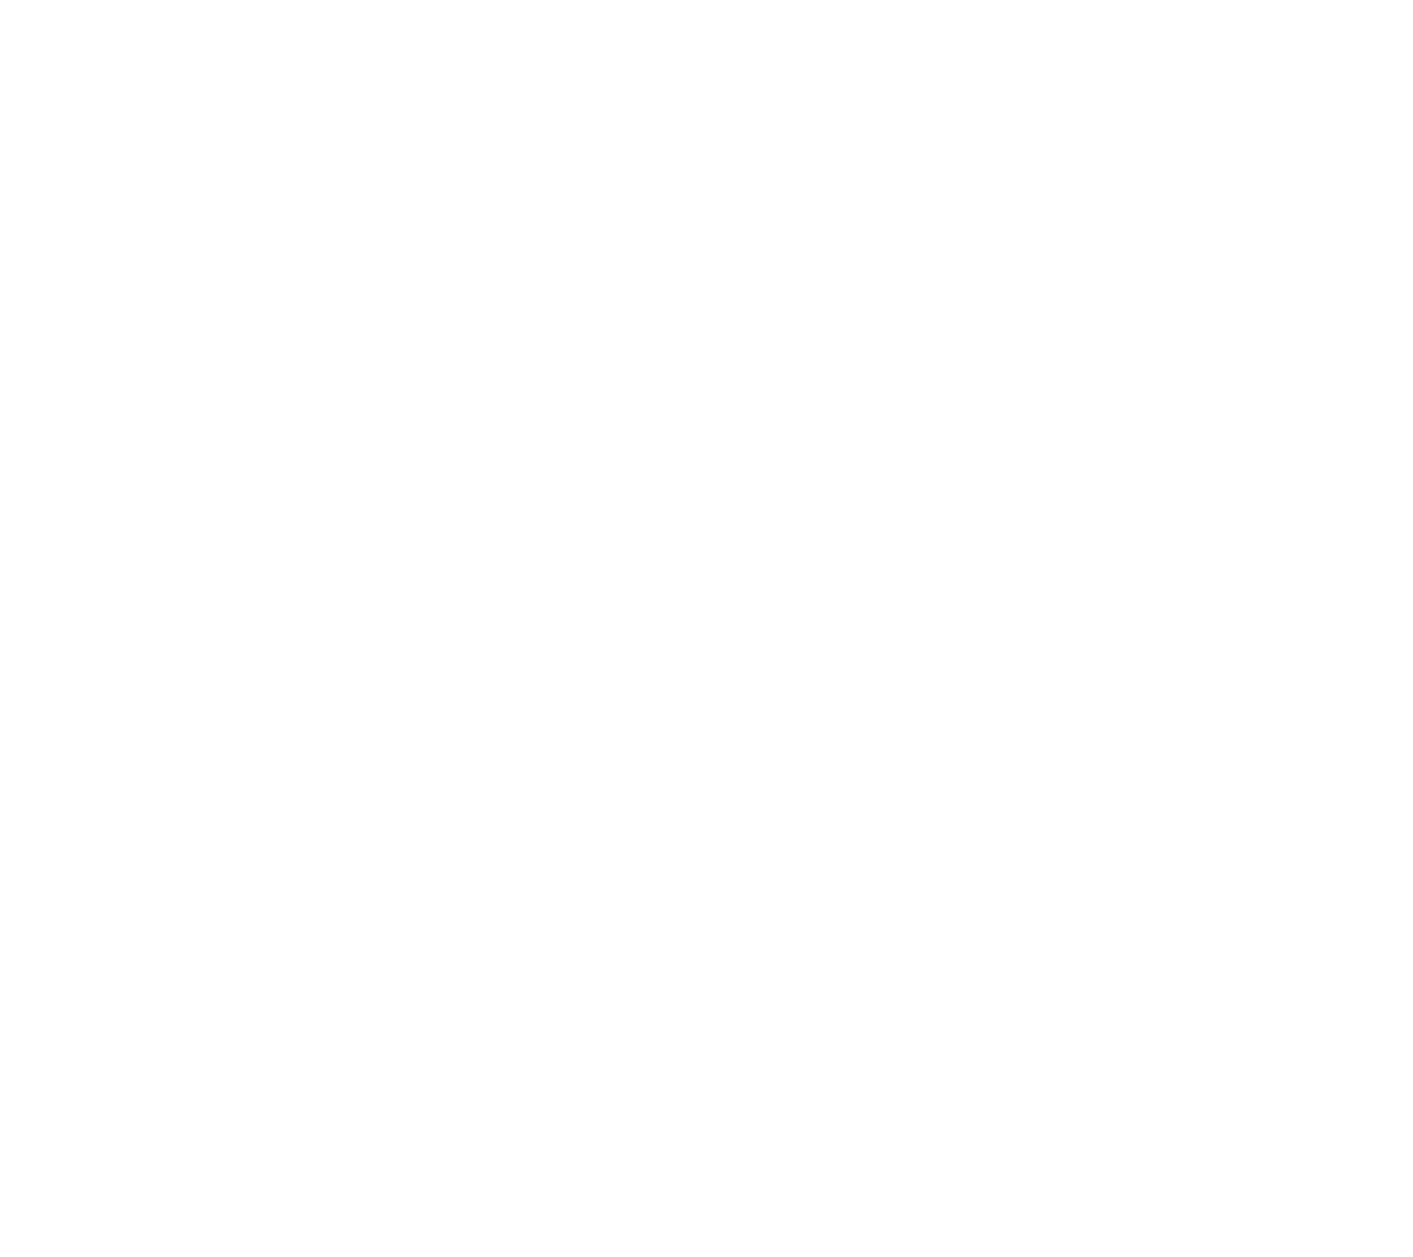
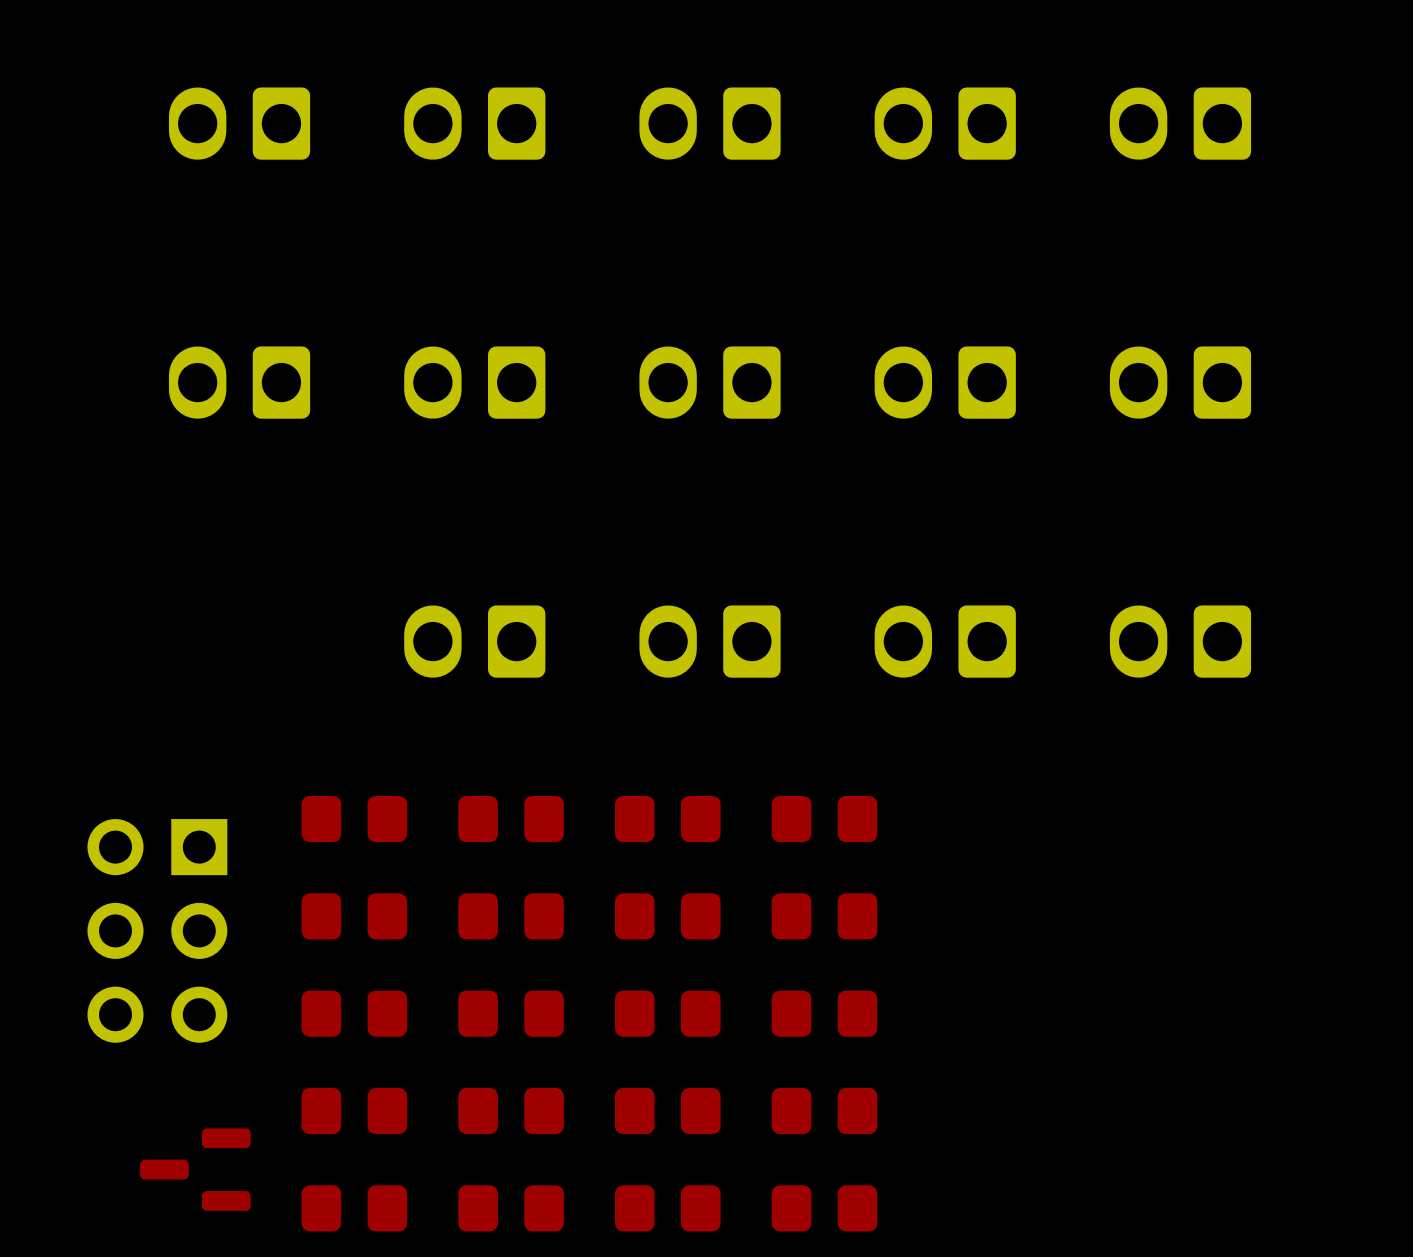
part: none -> (239, 123)
part: none -> (474, 123)
part: none -> (710, 123)
part: none -> (945, 123)
part: none -> (1180, 123)
part: none -> (239, 382)
part: none -> (474, 382)
part: none -> (710, 382)
part: none -> (945, 382)
part: none -> (1180, 382)
part: none -> (474, 641)
part: none -> (710, 641)
part: none -> (945, 641)
part: none -> (1180, 641)
part: none -> (354, 819)
part: none -> (511, 819)
part: none -> (667, 819)
part: none -> (824, 819)
part: none -> (354, 916)
part: none -> (511, 916)
part: none -> (667, 916)
part: none -> (824, 916)
part: none -> (157, 930)
part: none -> (354, 1013)
part: none -> (511, 1013)
part: none -> (667, 1013)
part: none -> (824, 1013)
part: none -> (354, 1111)
part: none -> (511, 1111)
part: none -> (667, 1111)
part: none -> (824, 1111)
part: none -> (195, 1169)
part: none -> (354, 1208)
part: none -> (511, 1208)
part: none -> (667, 1208)
part: none -> (824, 1208)

